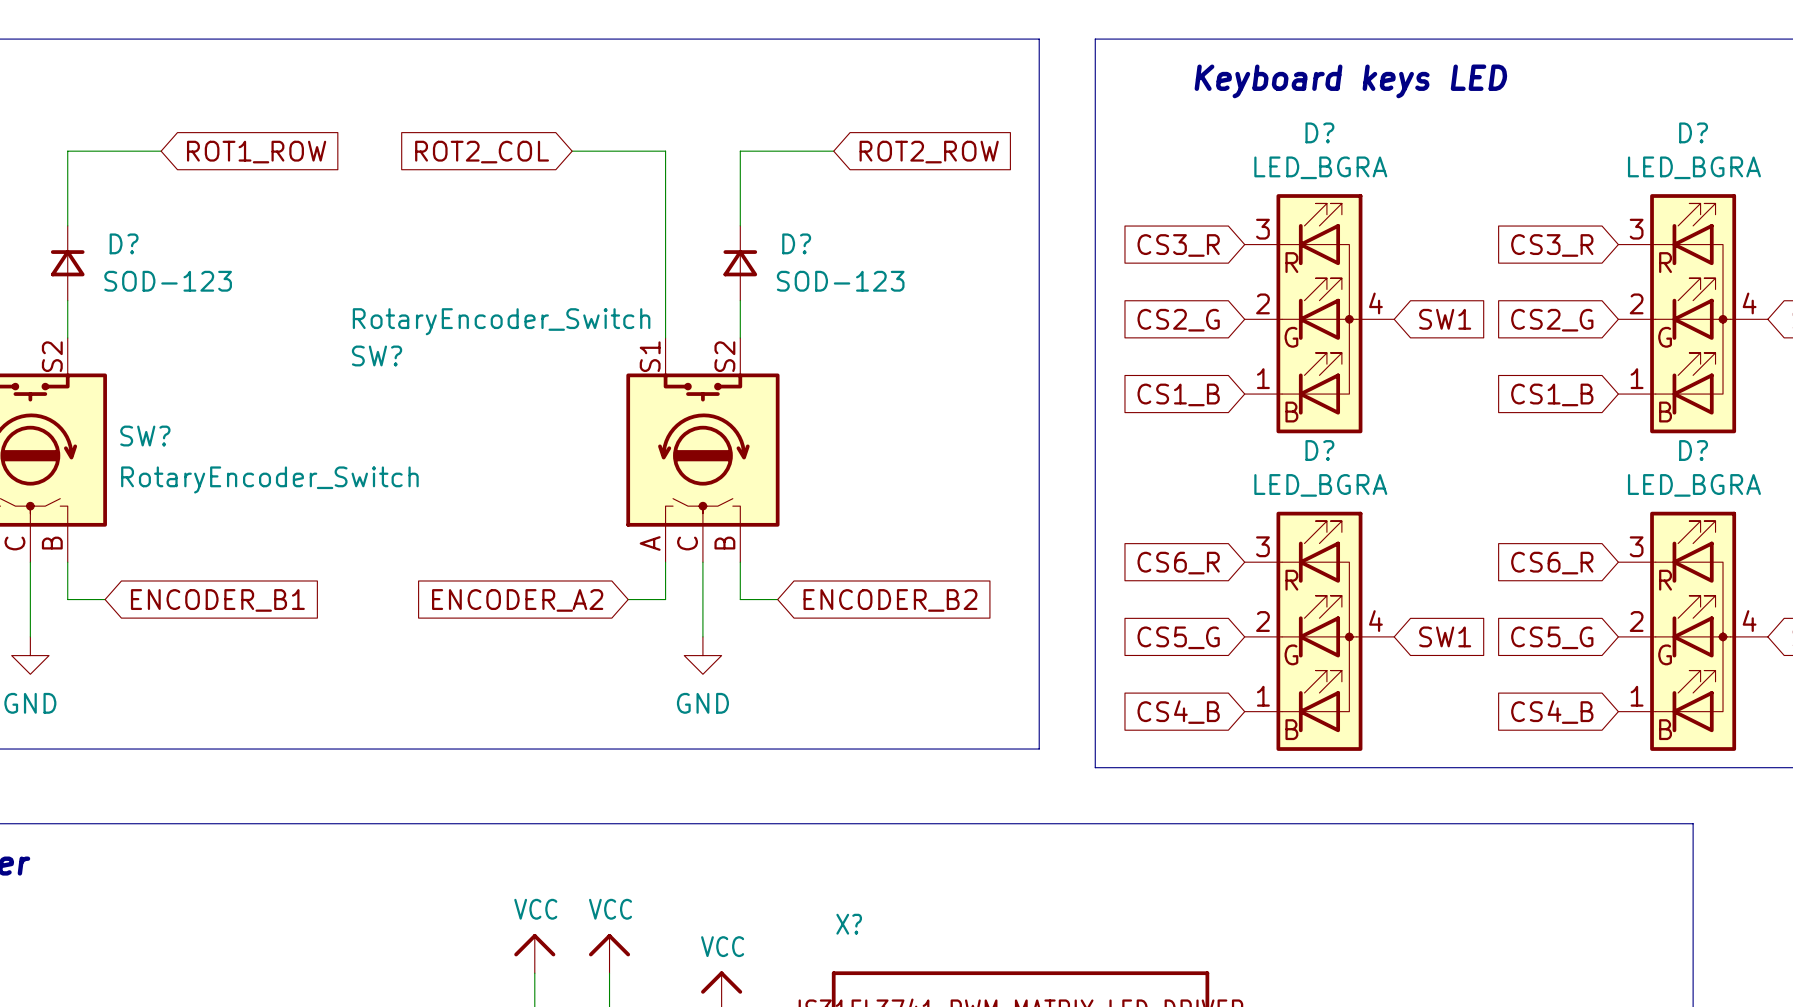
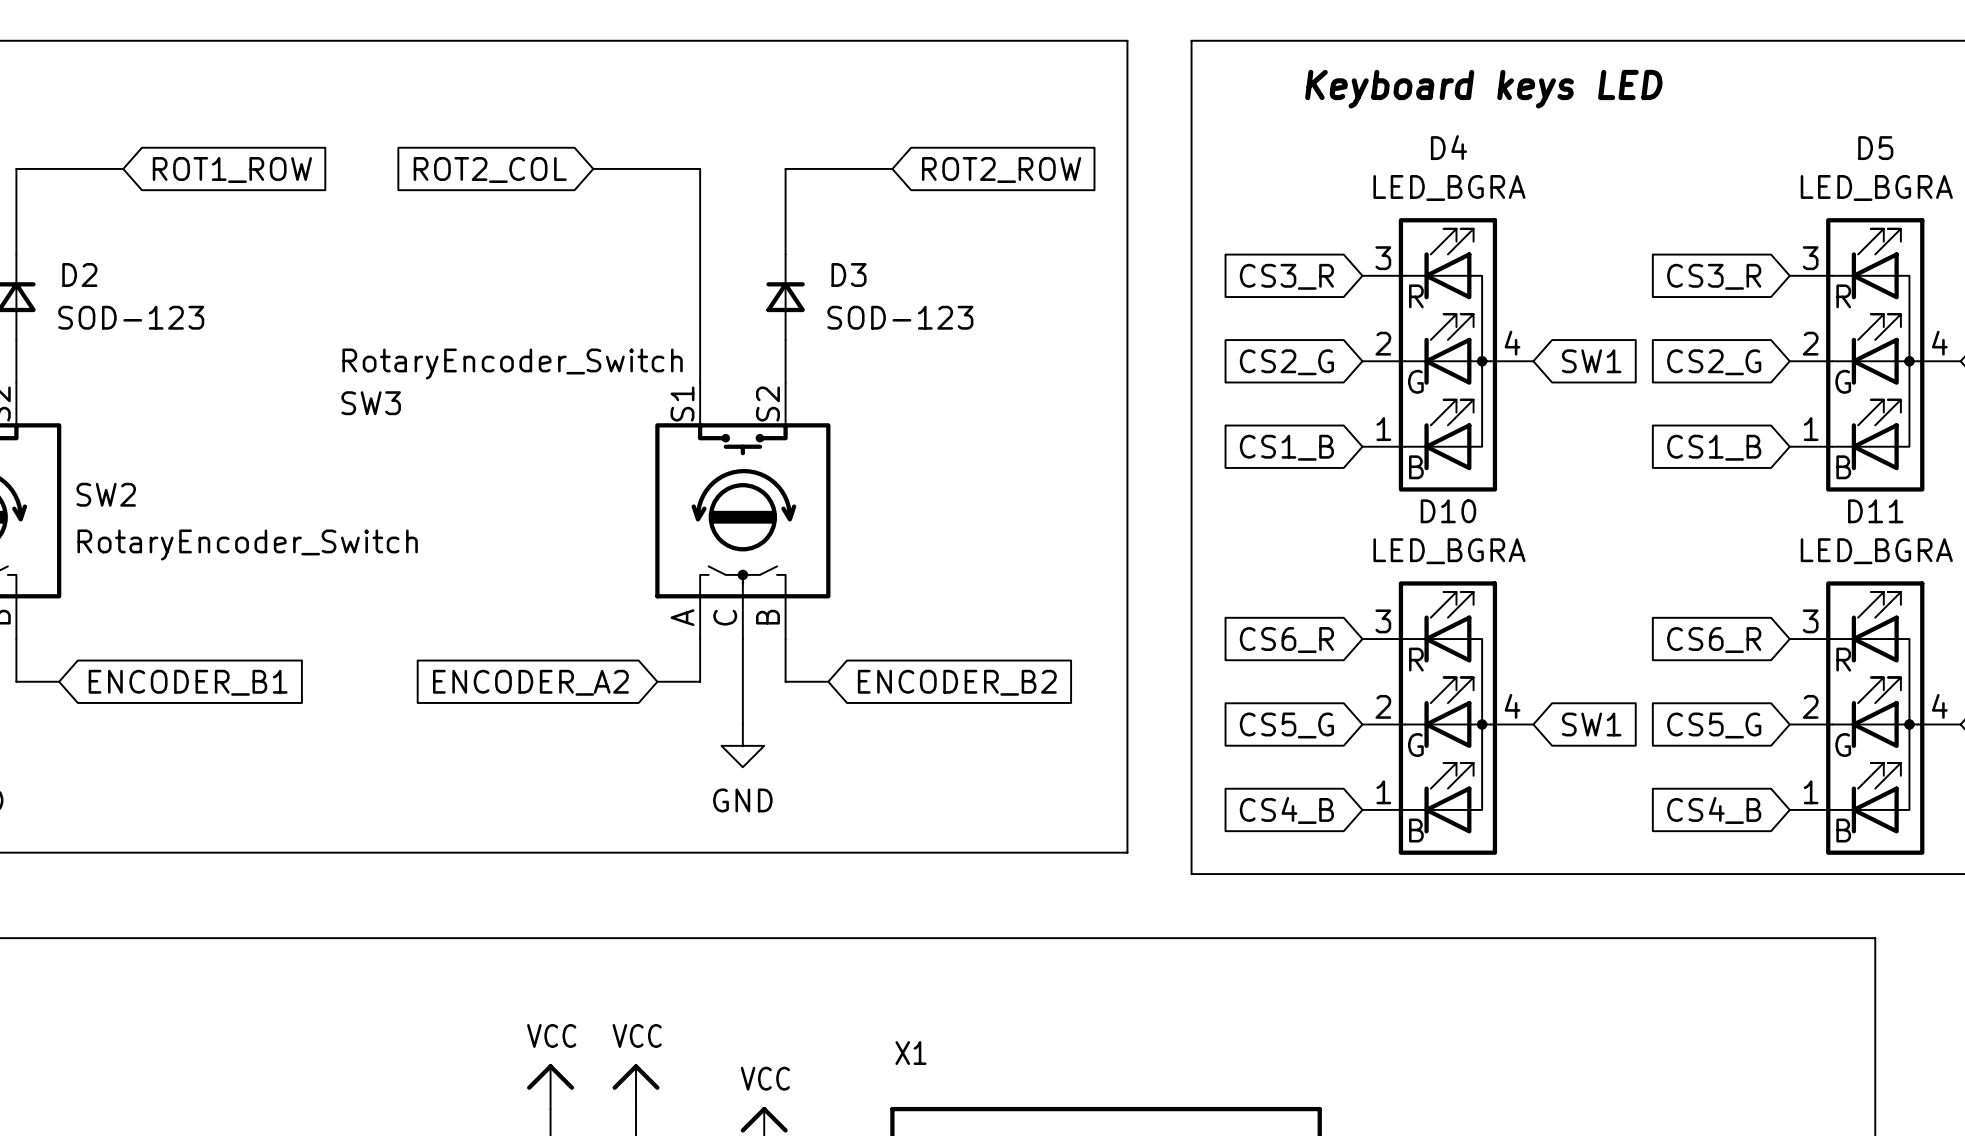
D? name: D? (1319, 132) -> D4 (1448, 147)
D? name: D? (1693, 132) -> D5 (1875, 148)
D? name: D? (124, 243) -> D2 (79, 275)
D? name: D? (796, 243) -> D3 (849, 275)
SW? name: SW? (377, 355) -> SW3 (371, 403)
SW? name: SW? (145, 436) -> SW2 (106, 494)
D? name: D? (1319, 450) -> D10 (1448, 511)
D? name: D? (1693, 450) -> D11 (1875, 511)
X? name: X? (849, 924) -> X1 (910, 1053)

